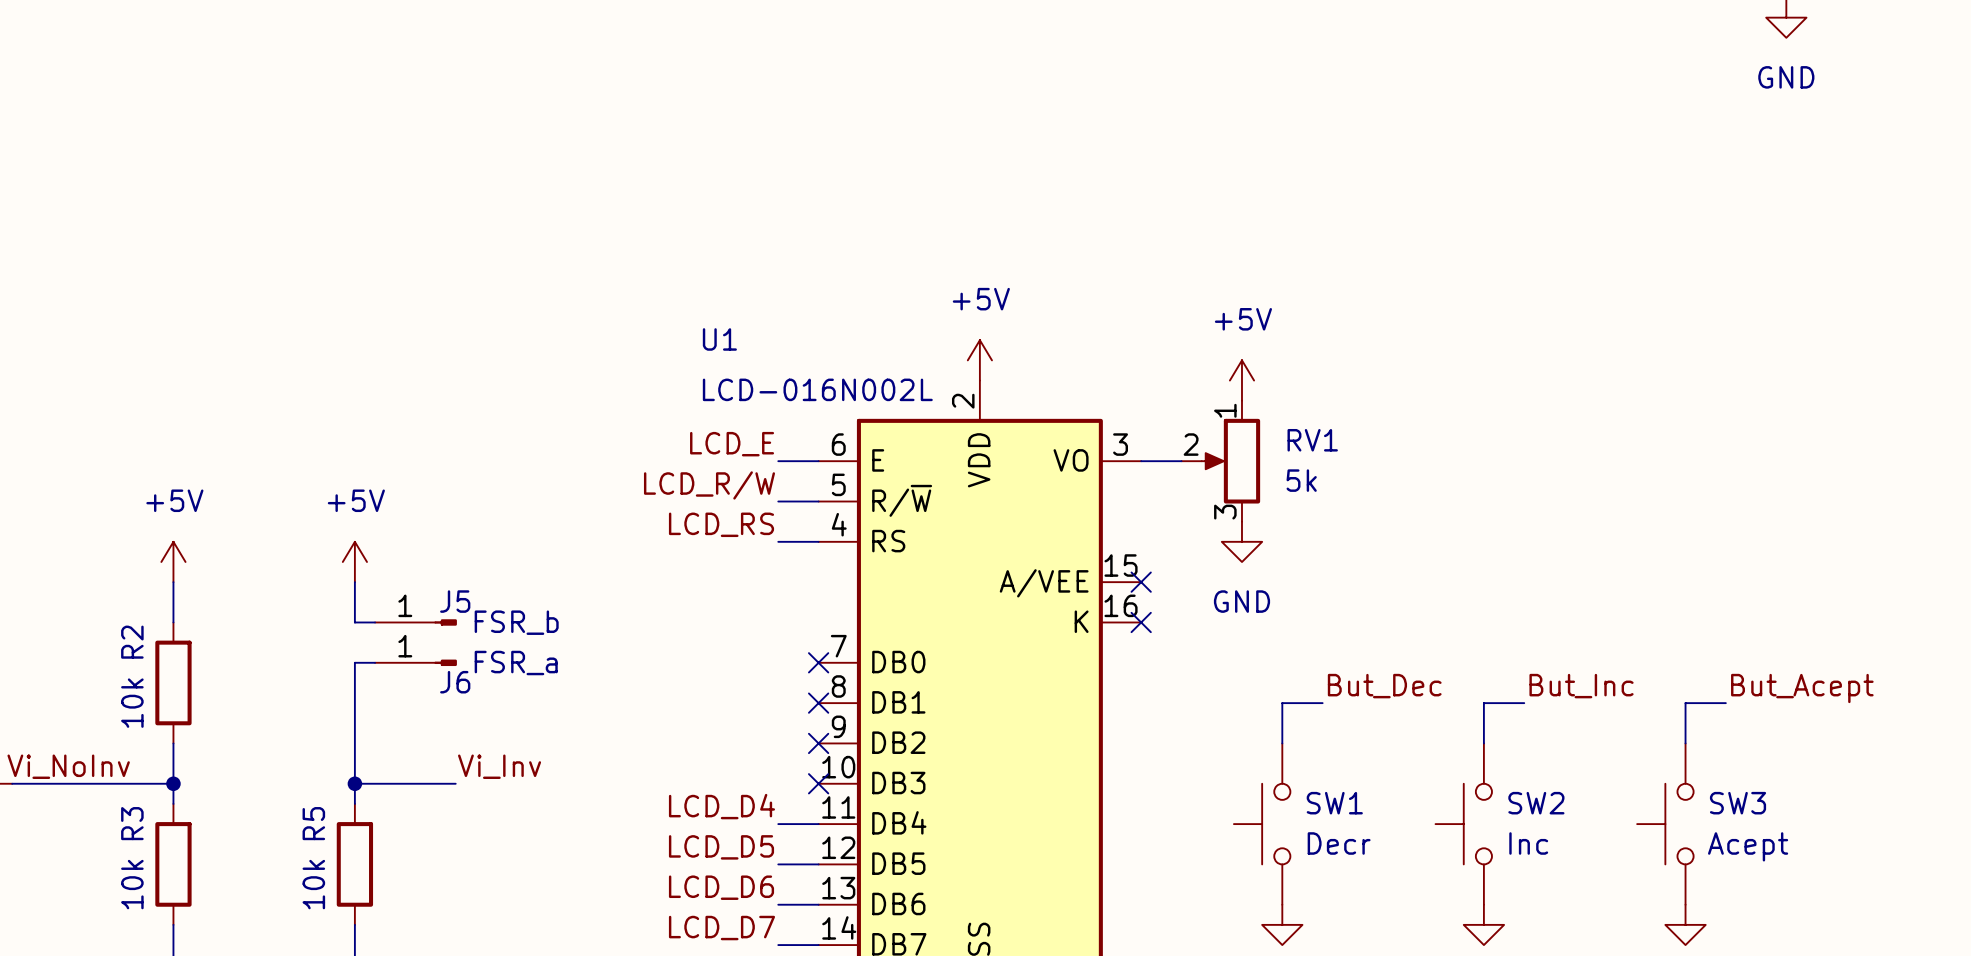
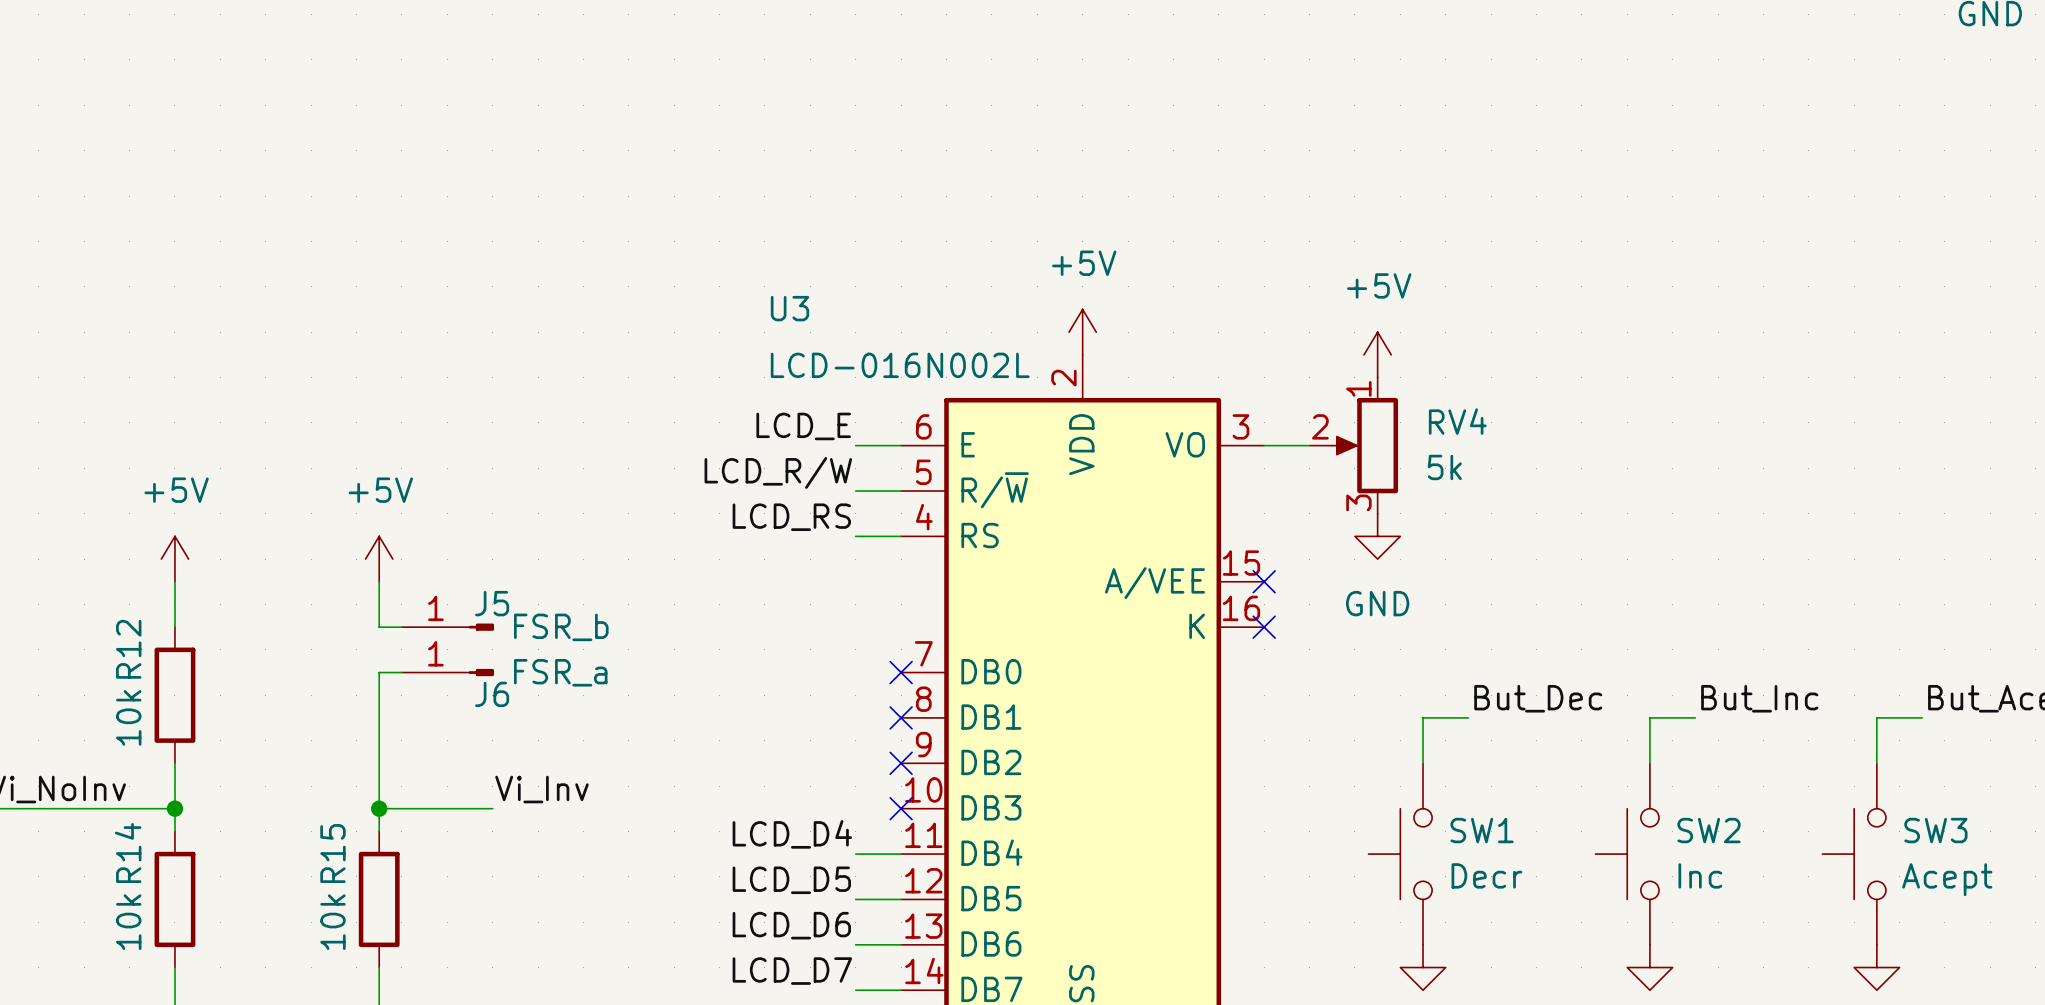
U1 name: U1 (719, 339) -> U3 (789, 308)
RV1 name: RV1 (1312, 440) -> RV4 (1457, 421)
R2 name: R2 (132, 642) -> R12 (128, 649)
R3 name: R3 (132, 823) -> R14 (128, 852)
R5 name: R5 (313, 823) -> R15 (332, 853)

